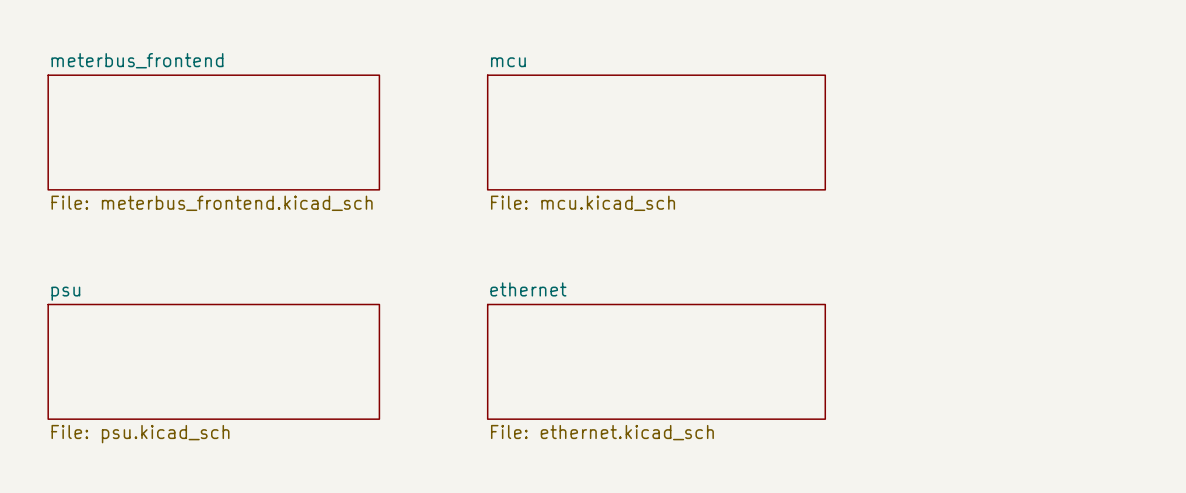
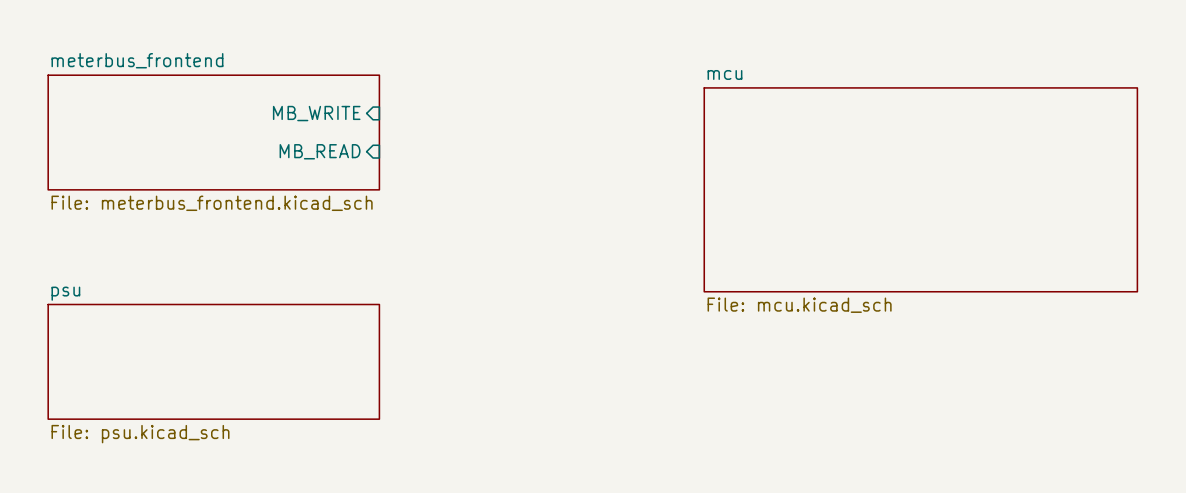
sheet pin: none -> MB_WRITE (316, 113)
sheet mcu: File: mcu.kicad_sch (656, 132) -> none
sheet pin: none -> MB_READ (320, 151)
sheet mcu: none -> File: mcu.kicad_sch (920, 189)
sheet ethernet: File: ethernet.kicad_sch (656, 361) -> none

